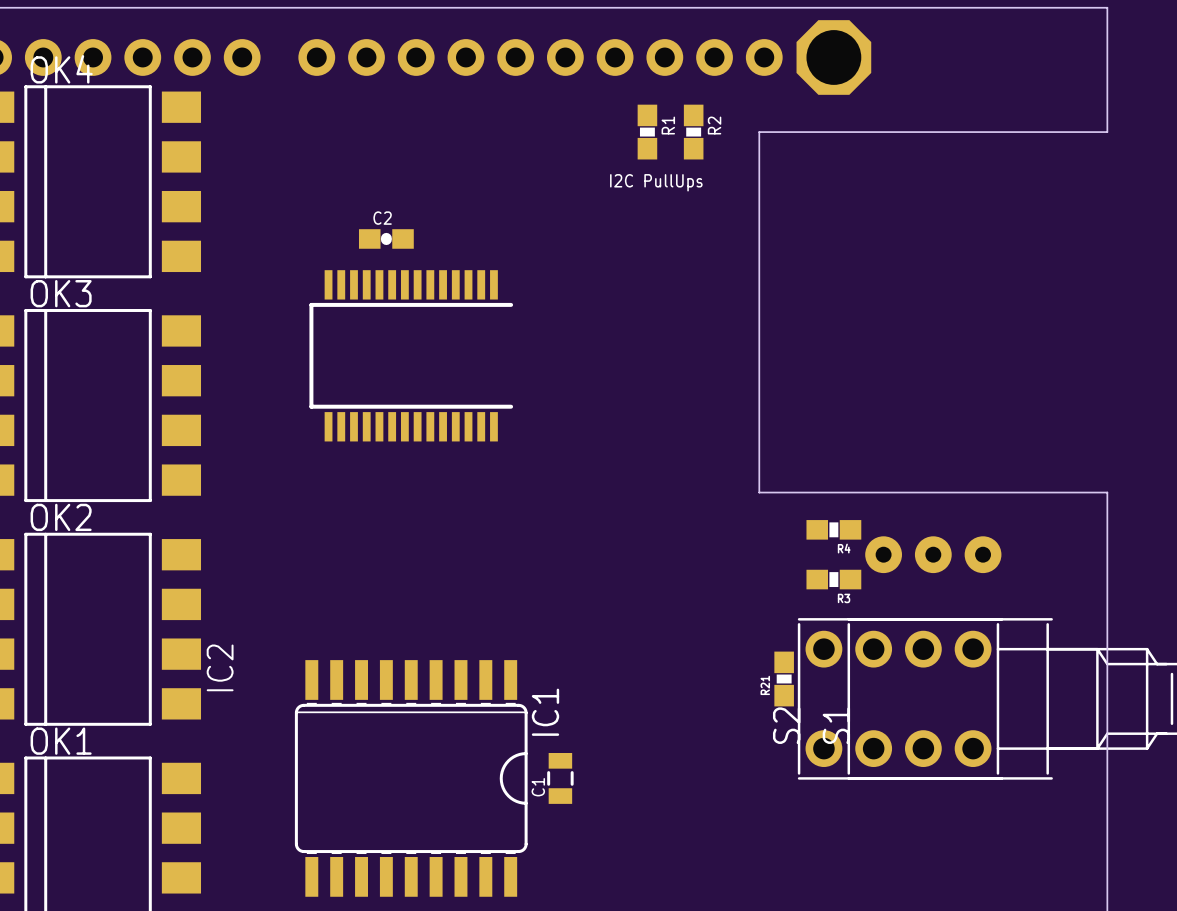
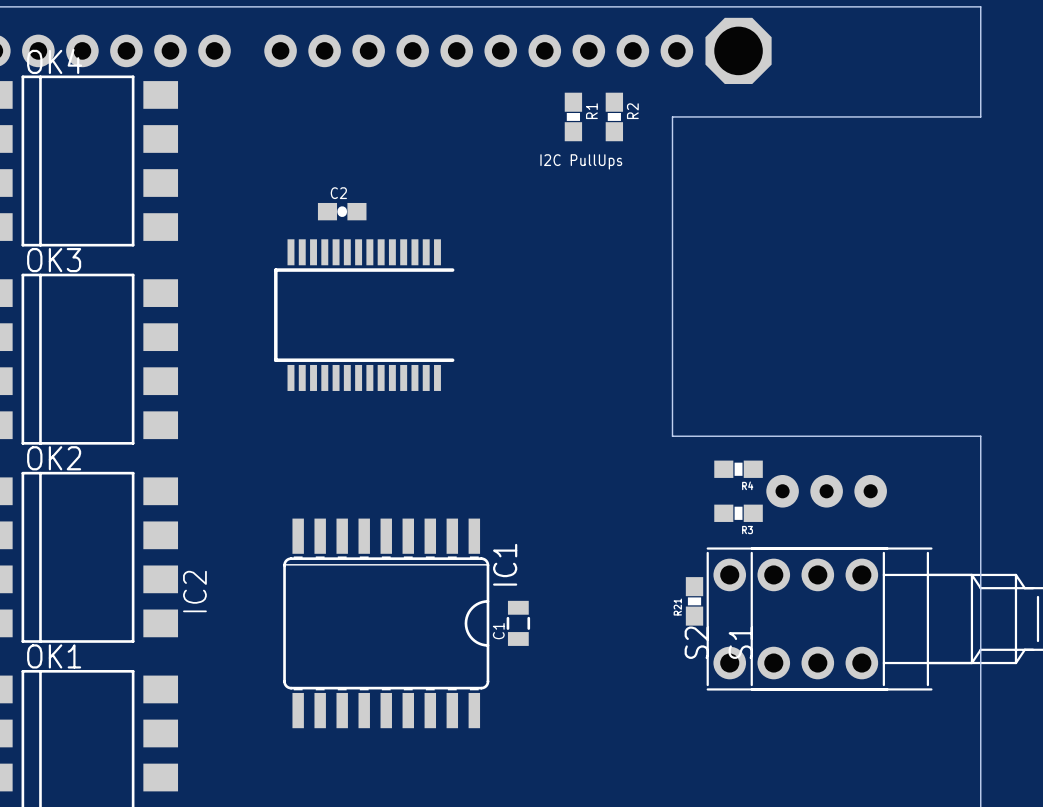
IC1 position: (411, 778) -> (386, 623)
C1 position: (560, 778) -> (518, 623)

